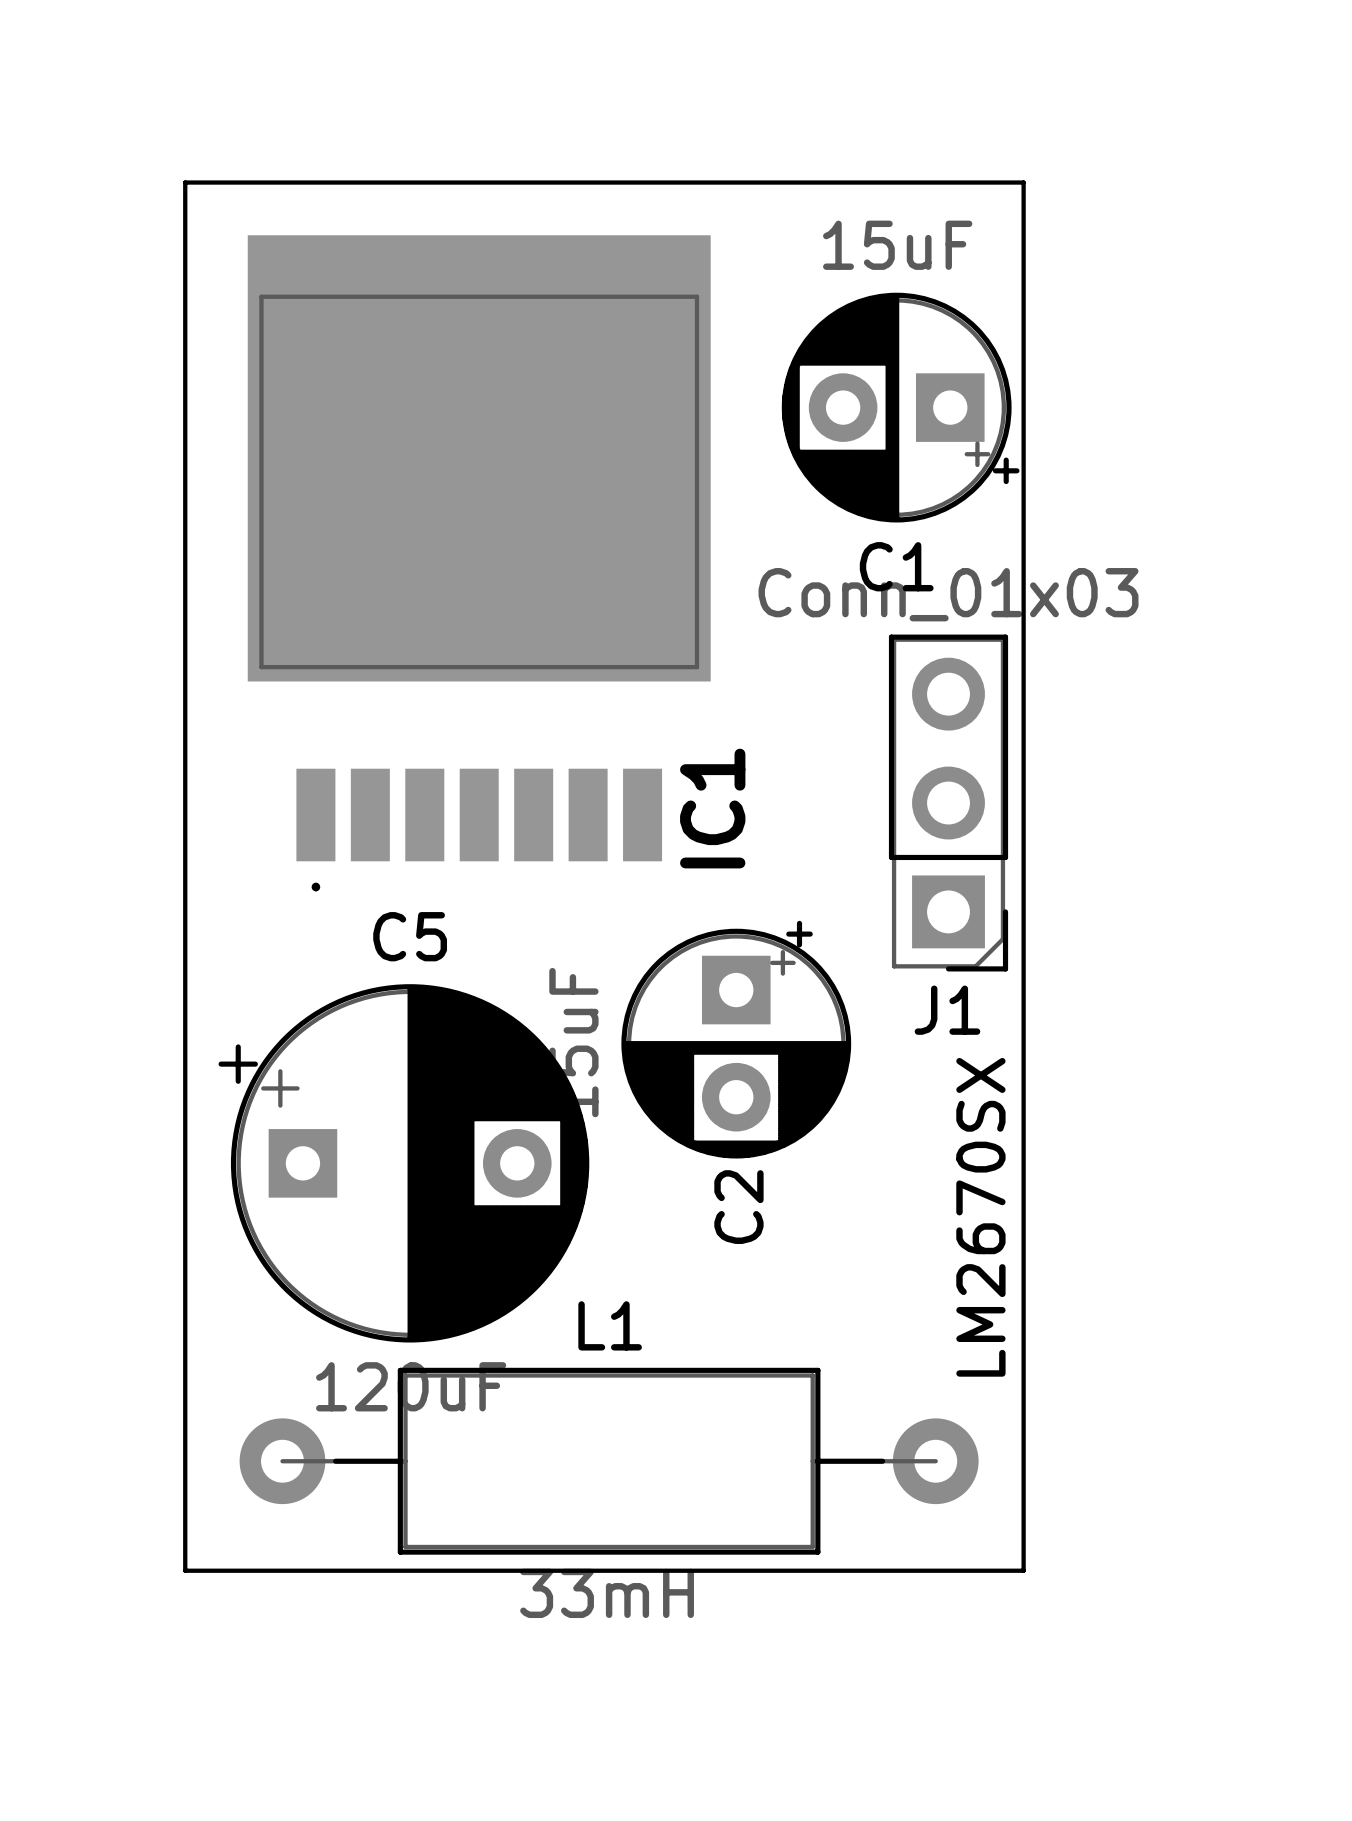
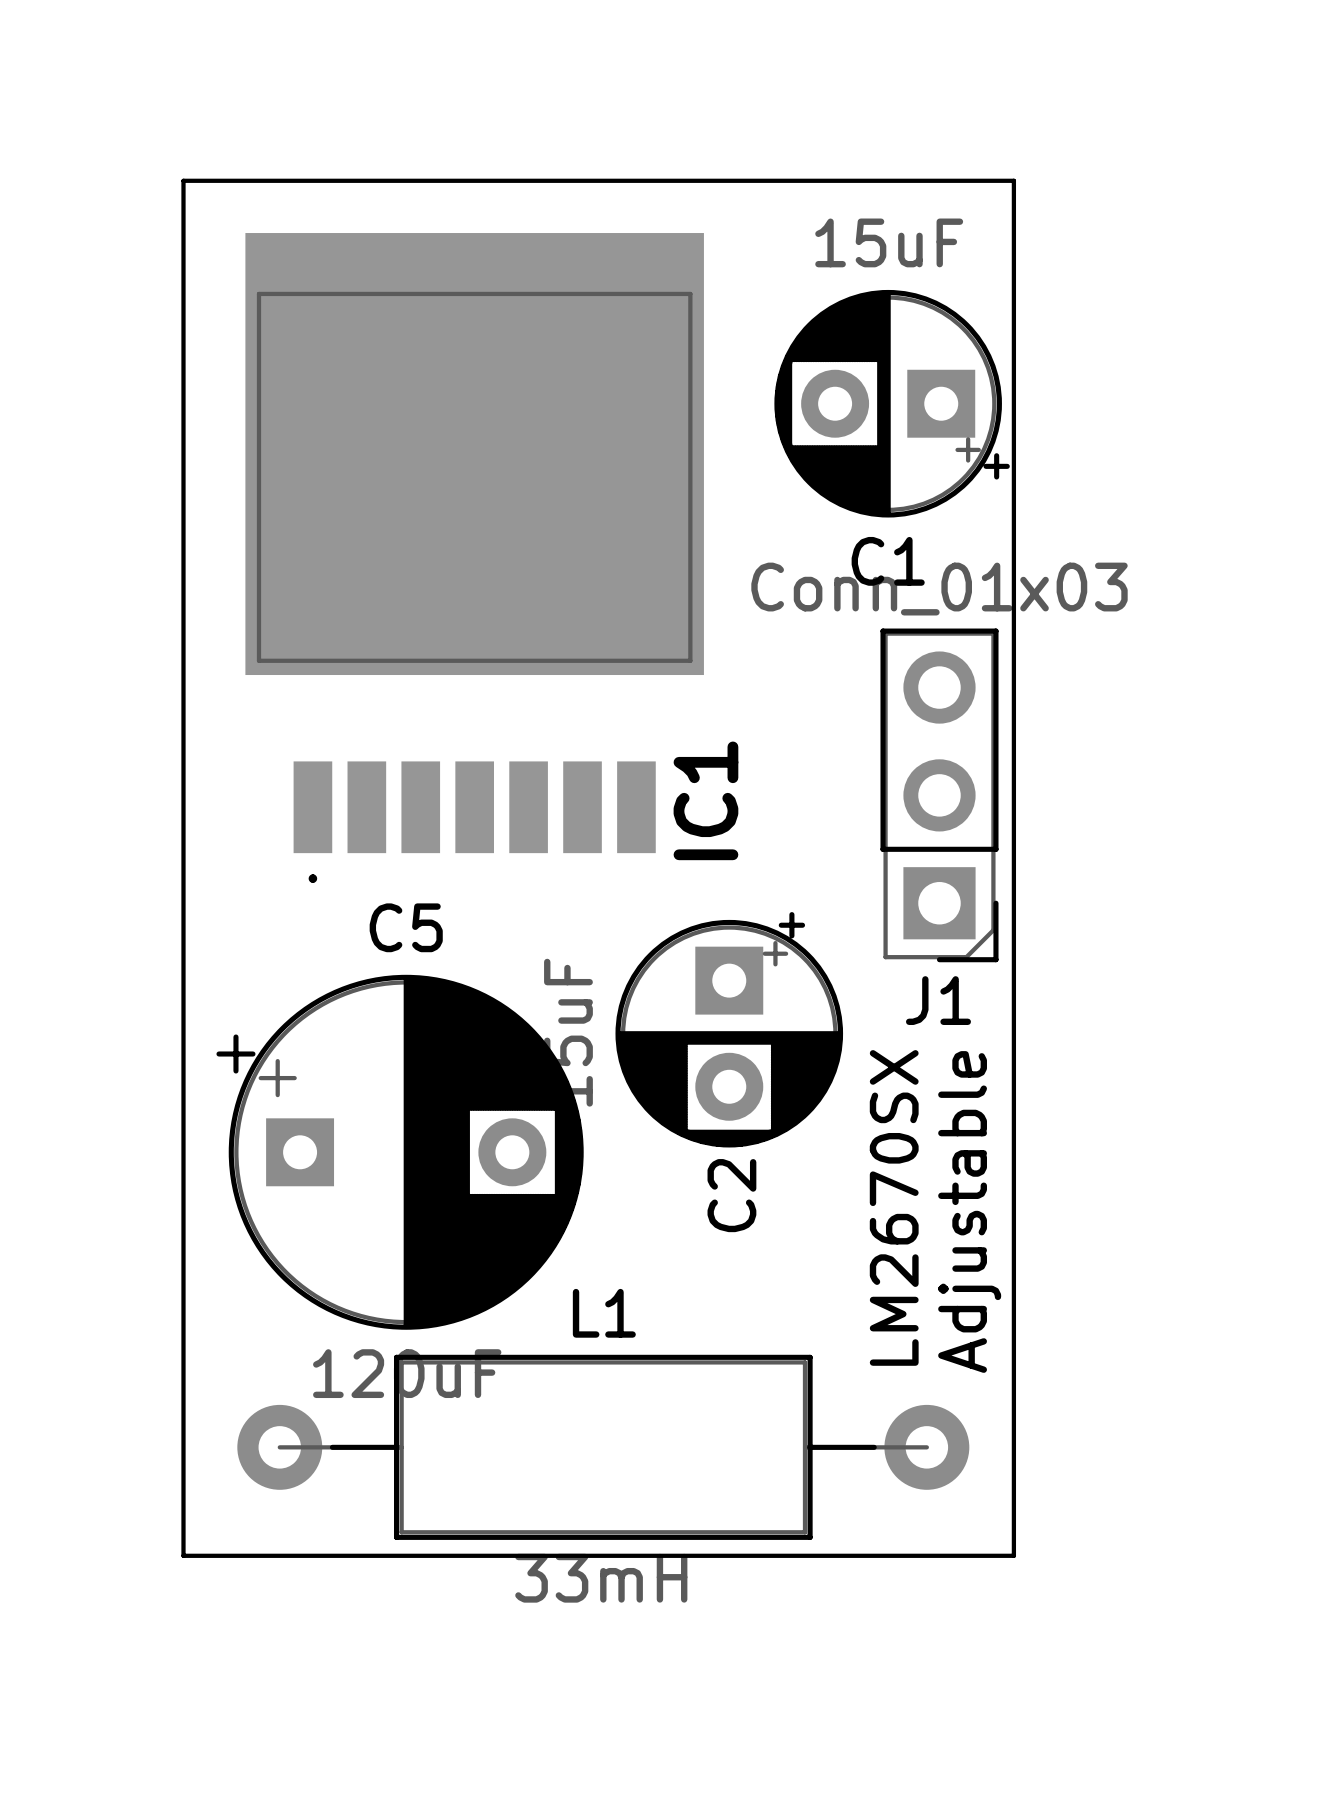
text position: LM2670SX (980, 1217) -> LM2670SX (894, 1207)
text: none -> Adjustable (969, 1211)

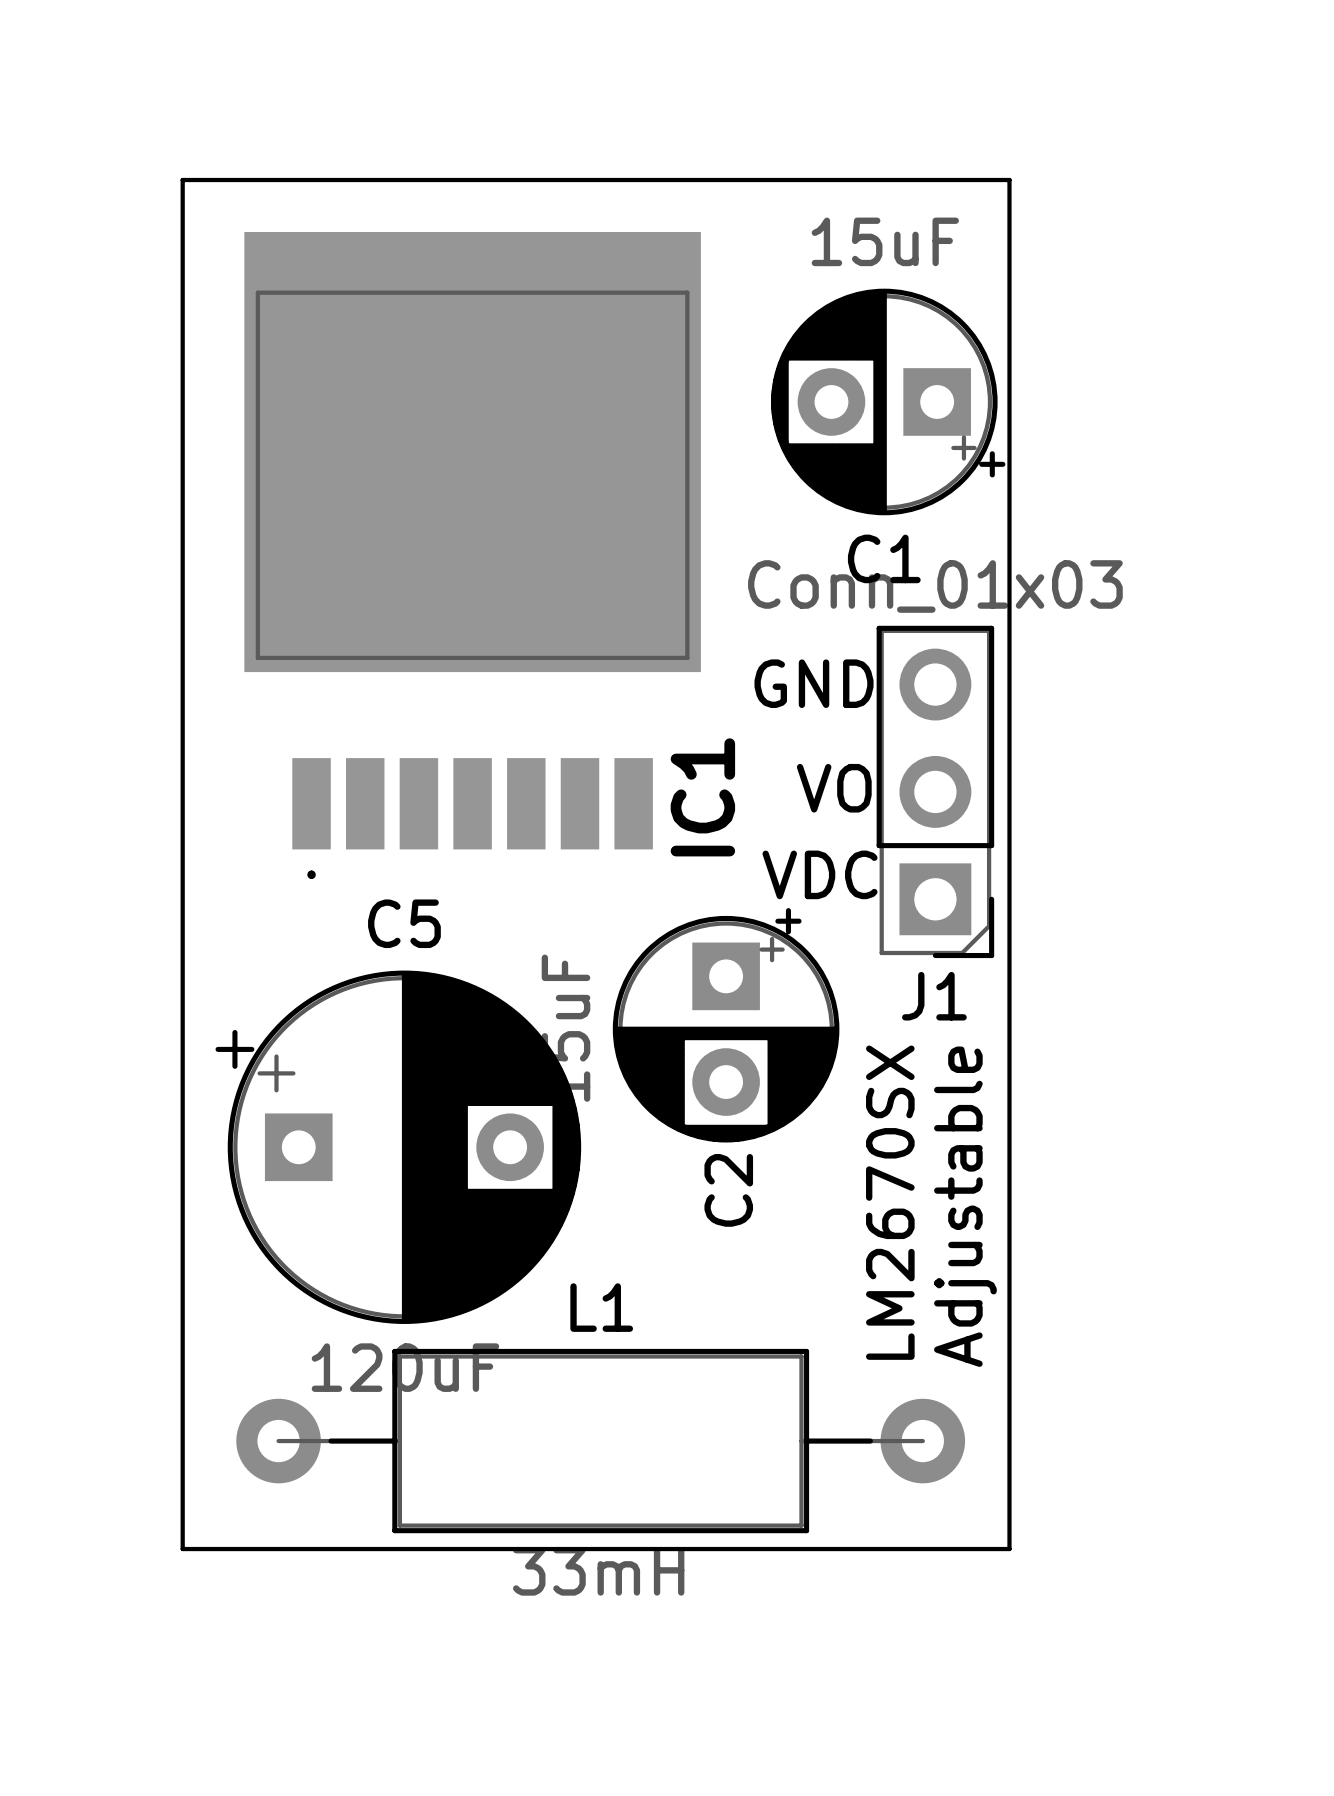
text: none -> GND (814, 683)
text: none -> VO (834, 788)
text: none -> VDC (820, 874)

